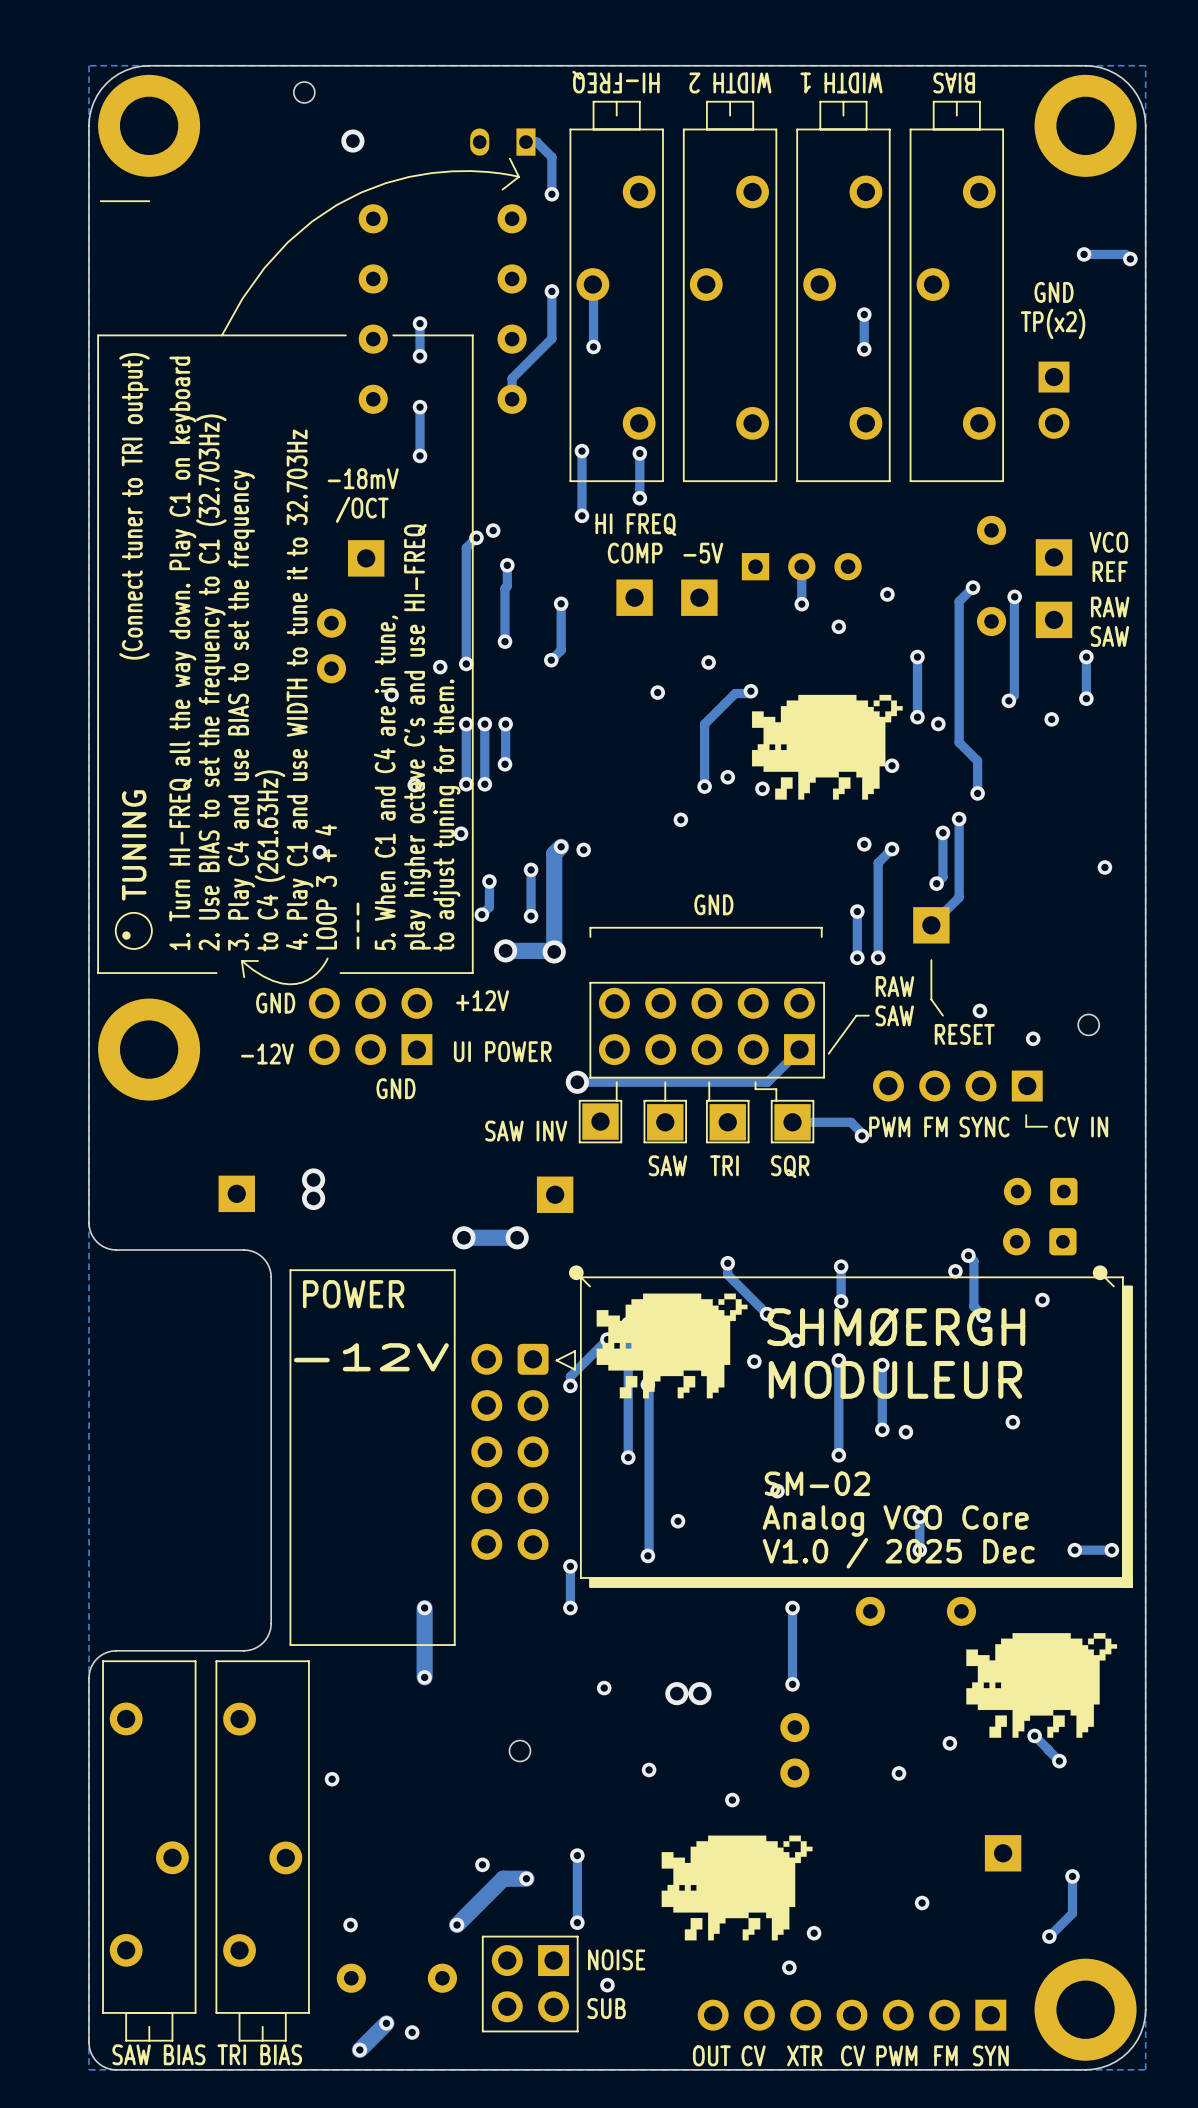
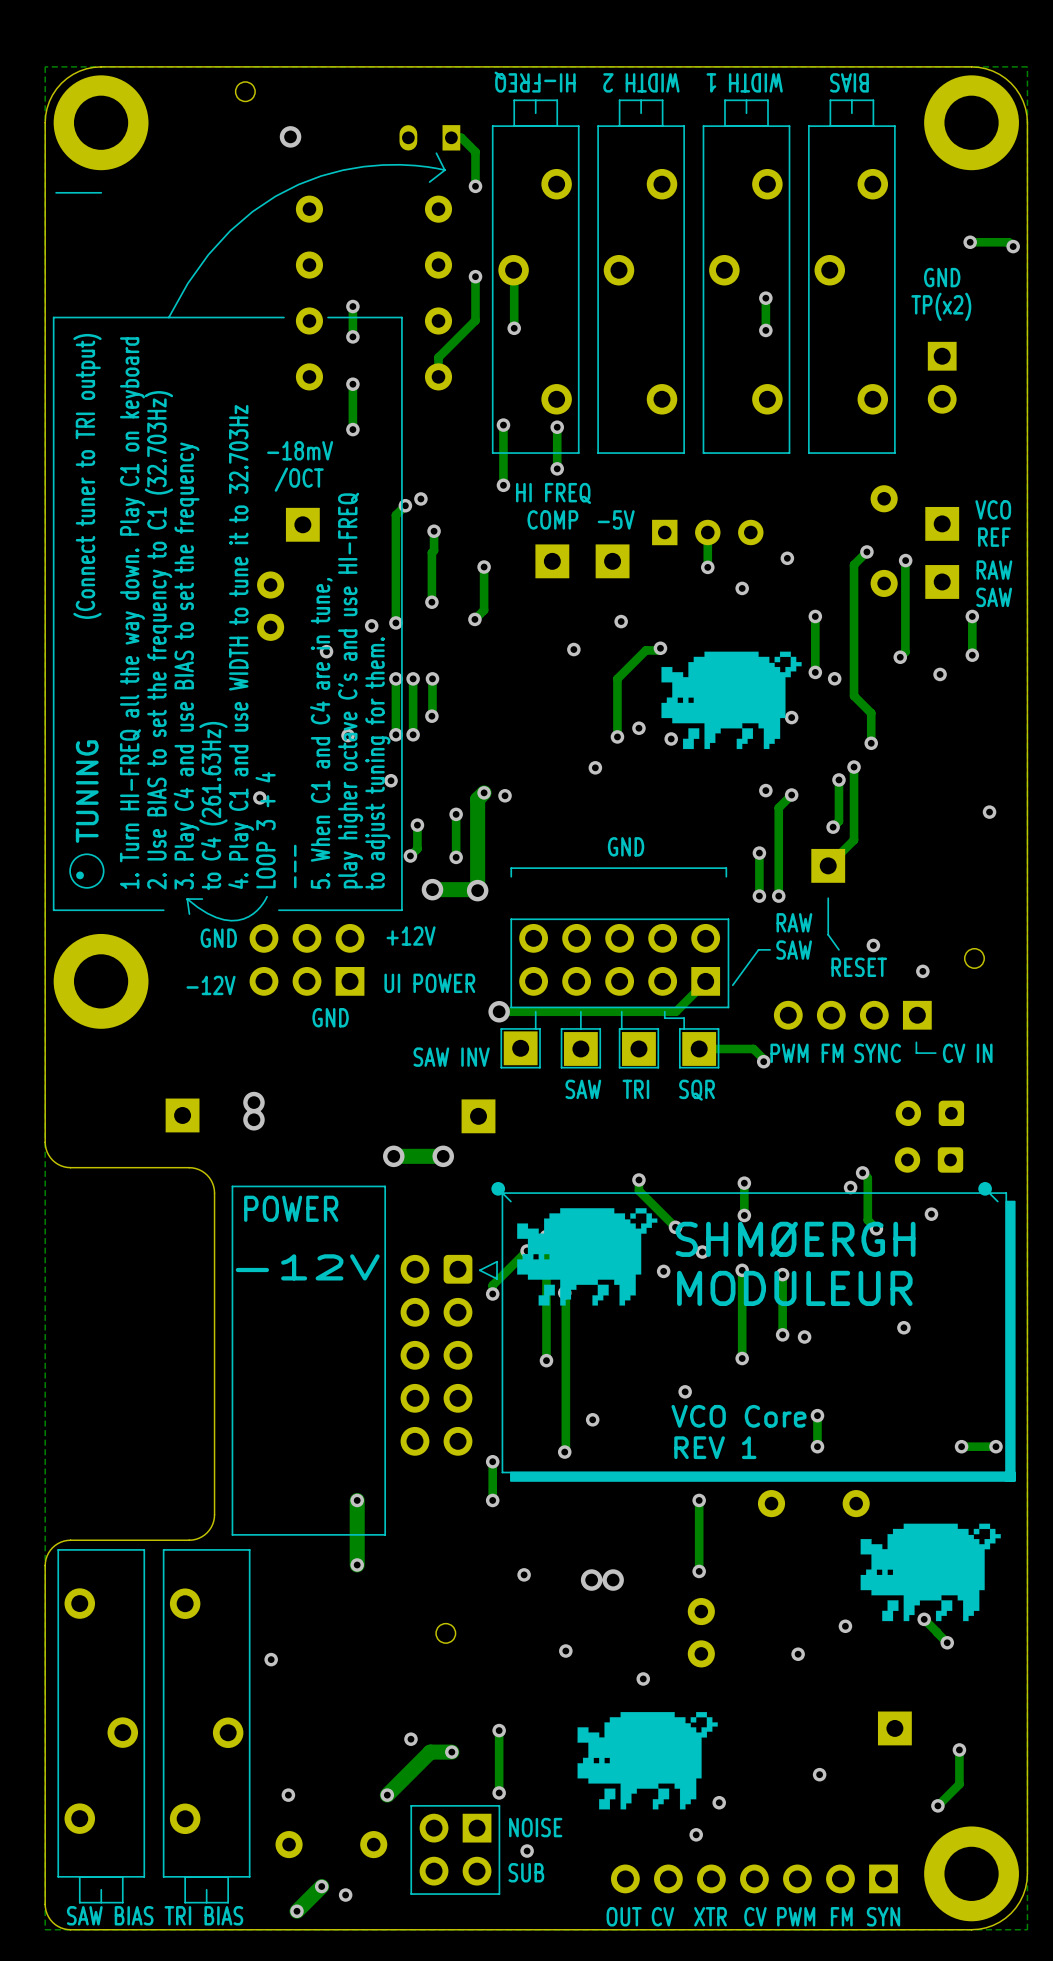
text: SM-02 (817, 1483) -> none
text: Analog VCO Core (895, 1520) -> VCO Core (738, 1416)
text: V1.0 / 2025 Dec (898, 1553) -> REV 1 (715, 1447)

